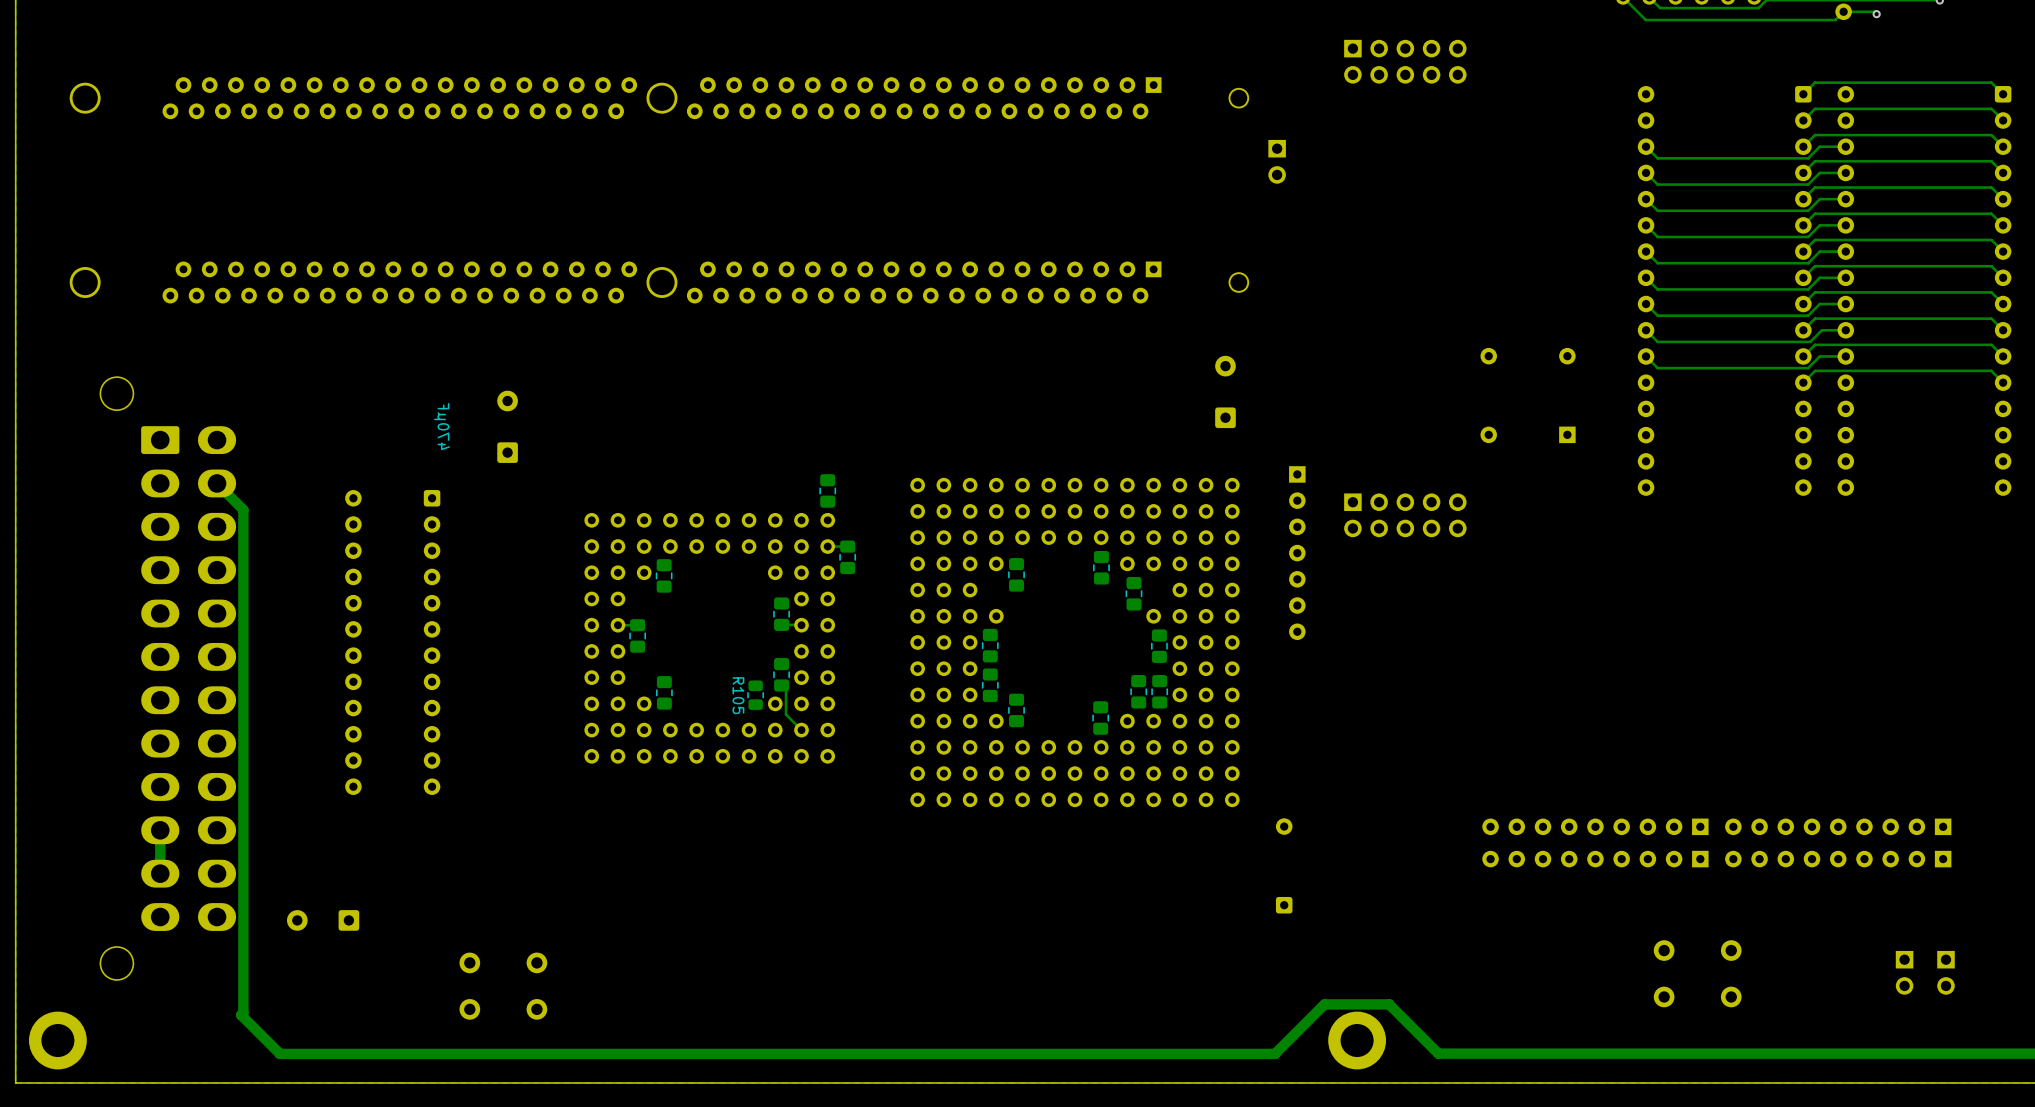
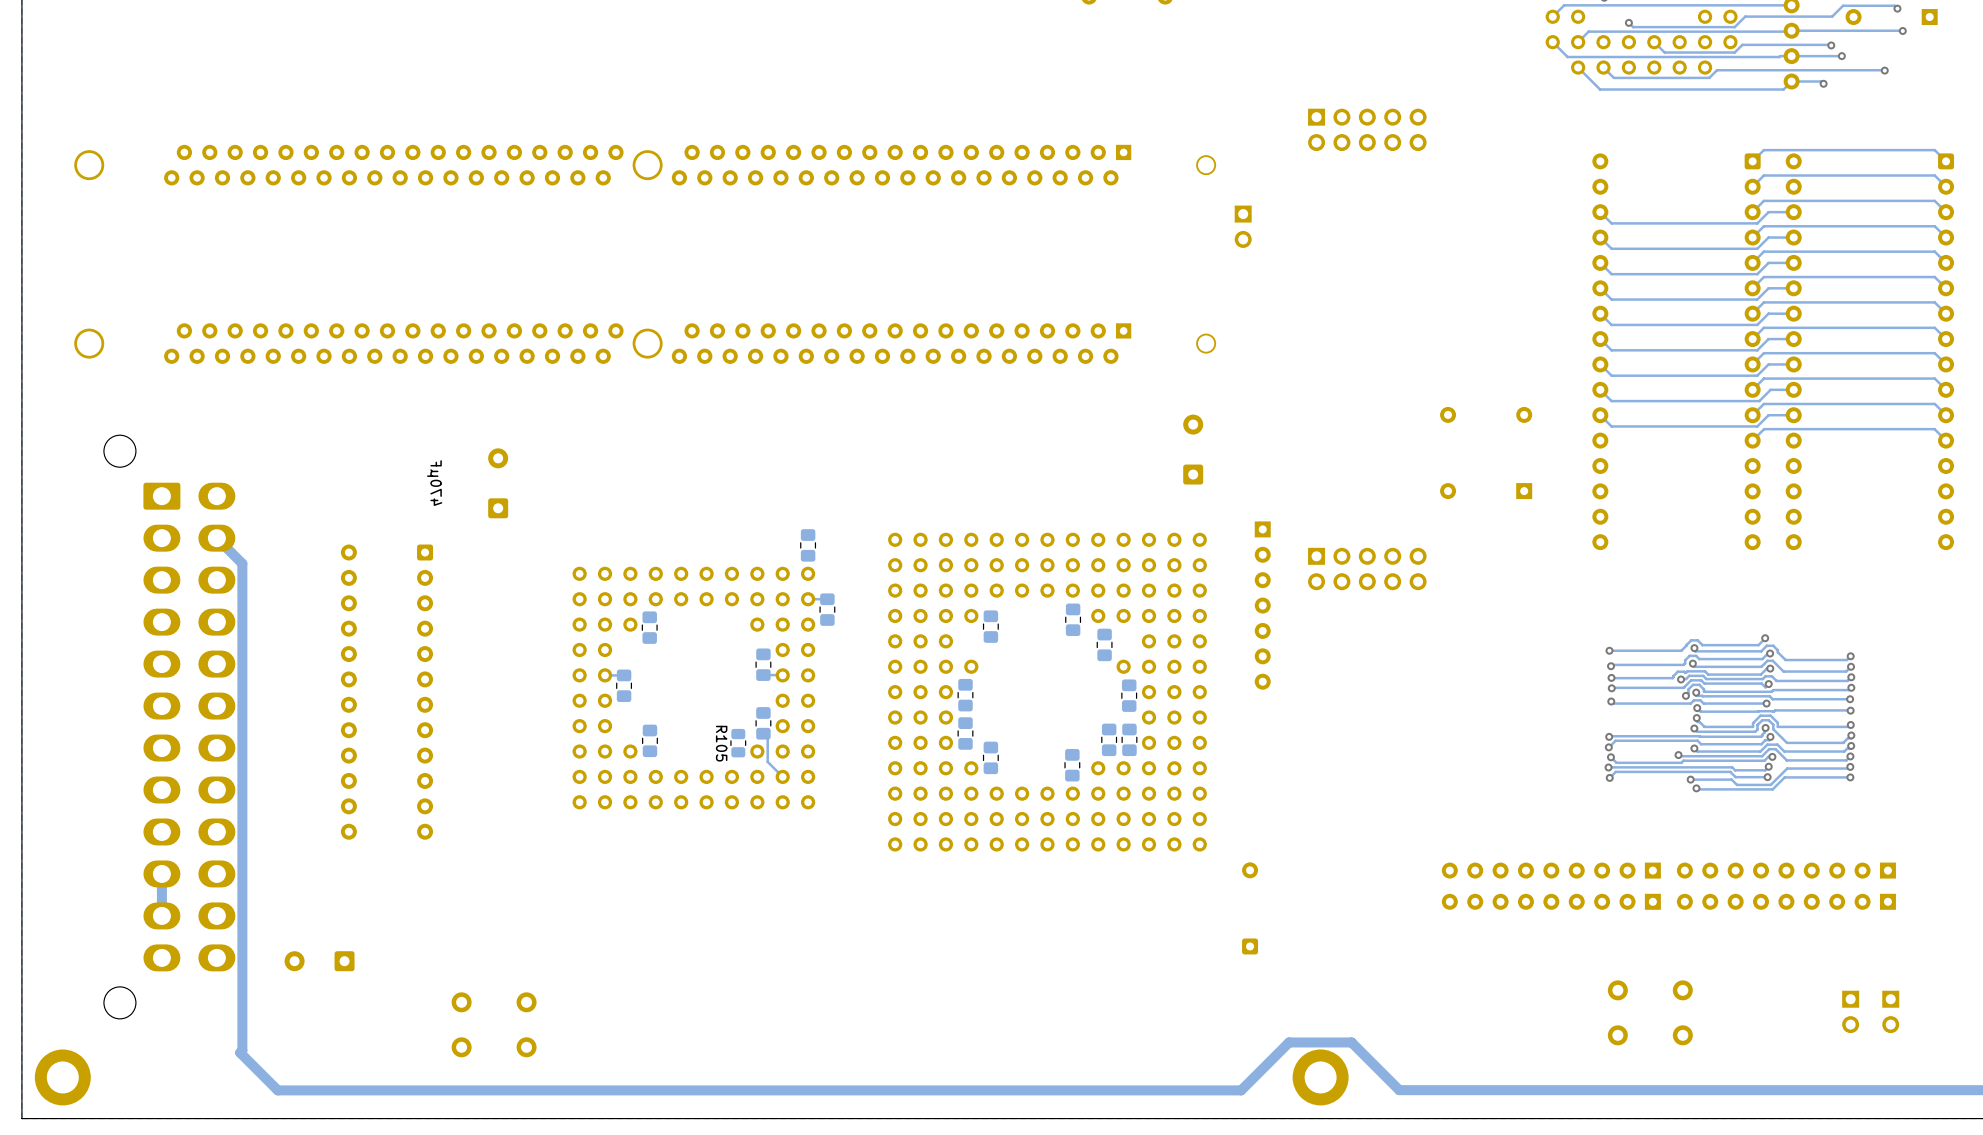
track: none -> (1765, 638) (1758, 645) (1702, 645) (1697, 640) (1691, 640) (1681, 650) (1609, 650)
via: none -> (1765, 638)
track: none -> (1694, 648) (1695, 651) (1761, 651) (1766, 645) (1773, 645) (1785, 660) (1846, 660) (1850, 656)
via: none -> (1694, 648)
via: none -> (1609, 650)
track: none -> (1770, 653) (1762, 659) (1699, 659) (1696, 655) (1689, 655) (1683, 664) (1611, 666)
via: none -> (1770, 653)
via: none -> (1850, 656)
track: none -> (1692, 663) (1693, 666) (1761, 666) (1767, 660) (1772, 660) (1783, 671) (1846, 671) (1851, 666)
via: none -> (1692, 663)
via: none -> (1611, 666)
via: none -> (1851, 666)
track: none -> (1770, 668) (1766, 668) (1760, 674) (1708, 674) (1705, 671) (1687, 671) (1677, 671) (1672, 678) (1611, 677)
via: none -> (1770, 668)
via: none -> (1611, 677)
track: none -> (1851, 677) (1847, 680) (1776, 680) (1771, 676) (1765, 676) (1762, 679) (1706, 679) (1703, 675) (1689, 675) (1686, 679) (1681, 679)
via: none -> (1851, 677)
via: none -> (1681, 679)
track: none -> (1768, 684) (1765, 687) (1761, 683) (1704, 683) (1701, 680) (1691, 680) (1683, 687) (1611, 688)
via: none -> (1768, 684)
track: none -> (1851, 687) (1849, 690) (1704, 691)
via: none -> (1851, 687)
via: none -> (1611, 688)
track: none -> (1703, 691) (1699, 684) (1693, 684) (1685, 695)
via: none -> (1696, 692)
via: none -> (1685, 695)
track: none -> (1696, 695) (1769, 696) (1772, 699) (1850, 699)
via: none -> (1850, 699)
track: none -> (1611, 701) (1613, 703) (1690, 703) (1694, 700) (1700, 700) (1703, 703) (1766, 703)
via: none -> (1611, 701)
via: none -> (1766, 703)
via: none -> (1697, 708)
track: none -> (1697, 708) (1697, 710) (1700, 711) (1850, 710)
via: none -> (1850, 710)
track: none -> (1696, 718) (1696, 720) (1704, 726) (1753, 726) (1753, 722) (1760, 715) (1770, 715) (1777, 722) (1777, 726) (1849, 726) (1850, 724)
via: none -> (1696, 718)
via: none -> (1850, 724)
track: none -> (1765, 727) (1761, 736) (1609, 736)
via: none -> (1765, 727)
track: none -> (1694, 728) (1697, 731) (1755, 731) (1757, 724) (1762, 720) (1768, 720) (1773, 724) (1773, 729) (1786, 742) (1843, 742)
via: none -> (1694, 728)
track: none -> (1851, 735) (1851, 738) (1847, 738) (1843, 742)
via: none -> (1851, 735)
via: none -> (1609, 736)
track: none -> (1770, 736) (1769, 740) (1765, 740) (1761, 744) (1701, 744) (1697, 740) (1615, 740) (1608, 747)
via: none -> (1770, 736)
track: none -> (1851, 746) (1844, 751) (1784, 751) (1777, 744) (1767, 744) (1760, 751) (1697, 751) (1694, 748)
via: none -> (1851, 745)
via: none -> (1608, 747)
via: none -> (1694, 748)
track: none -> (1678, 755) (1762, 756) (1769, 749) (1775, 749) (1786, 760) (1846, 760) (1850, 756)
via: none -> (1678, 755)
via: none -> (1850, 756)
via: none -> (1610, 757)
track: none -> (1772, 756) (1768, 756) (1764, 760) (1683, 760) (1681, 762) (1616, 762) (1610, 757)
via: none -> (1772, 756)
track: none -> (1768, 766) (1765, 770) (1735, 770) (1732, 767) (1608, 767)
via: none -> (1768, 766)
track: none -> (1850, 766) (1848, 768) (1787, 768) (1770, 784) (1736, 784) (1731, 779) (1690, 779)
via: none -> (1850, 766)
via: none -> (1608, 767)
track: none -> (1767, 777) (1735, 777) (1730, 771) (1615, 771) (1609, 777)
via: none -> (1767, 777)
track: none -> (1850, 777) (1784, 777) (1772, 789) (1696, 788)
via: none -> (1850, 777)
via: none -> (1609, 777)
via: none -> (1690, 779)
via: none -> (1696, 788)

